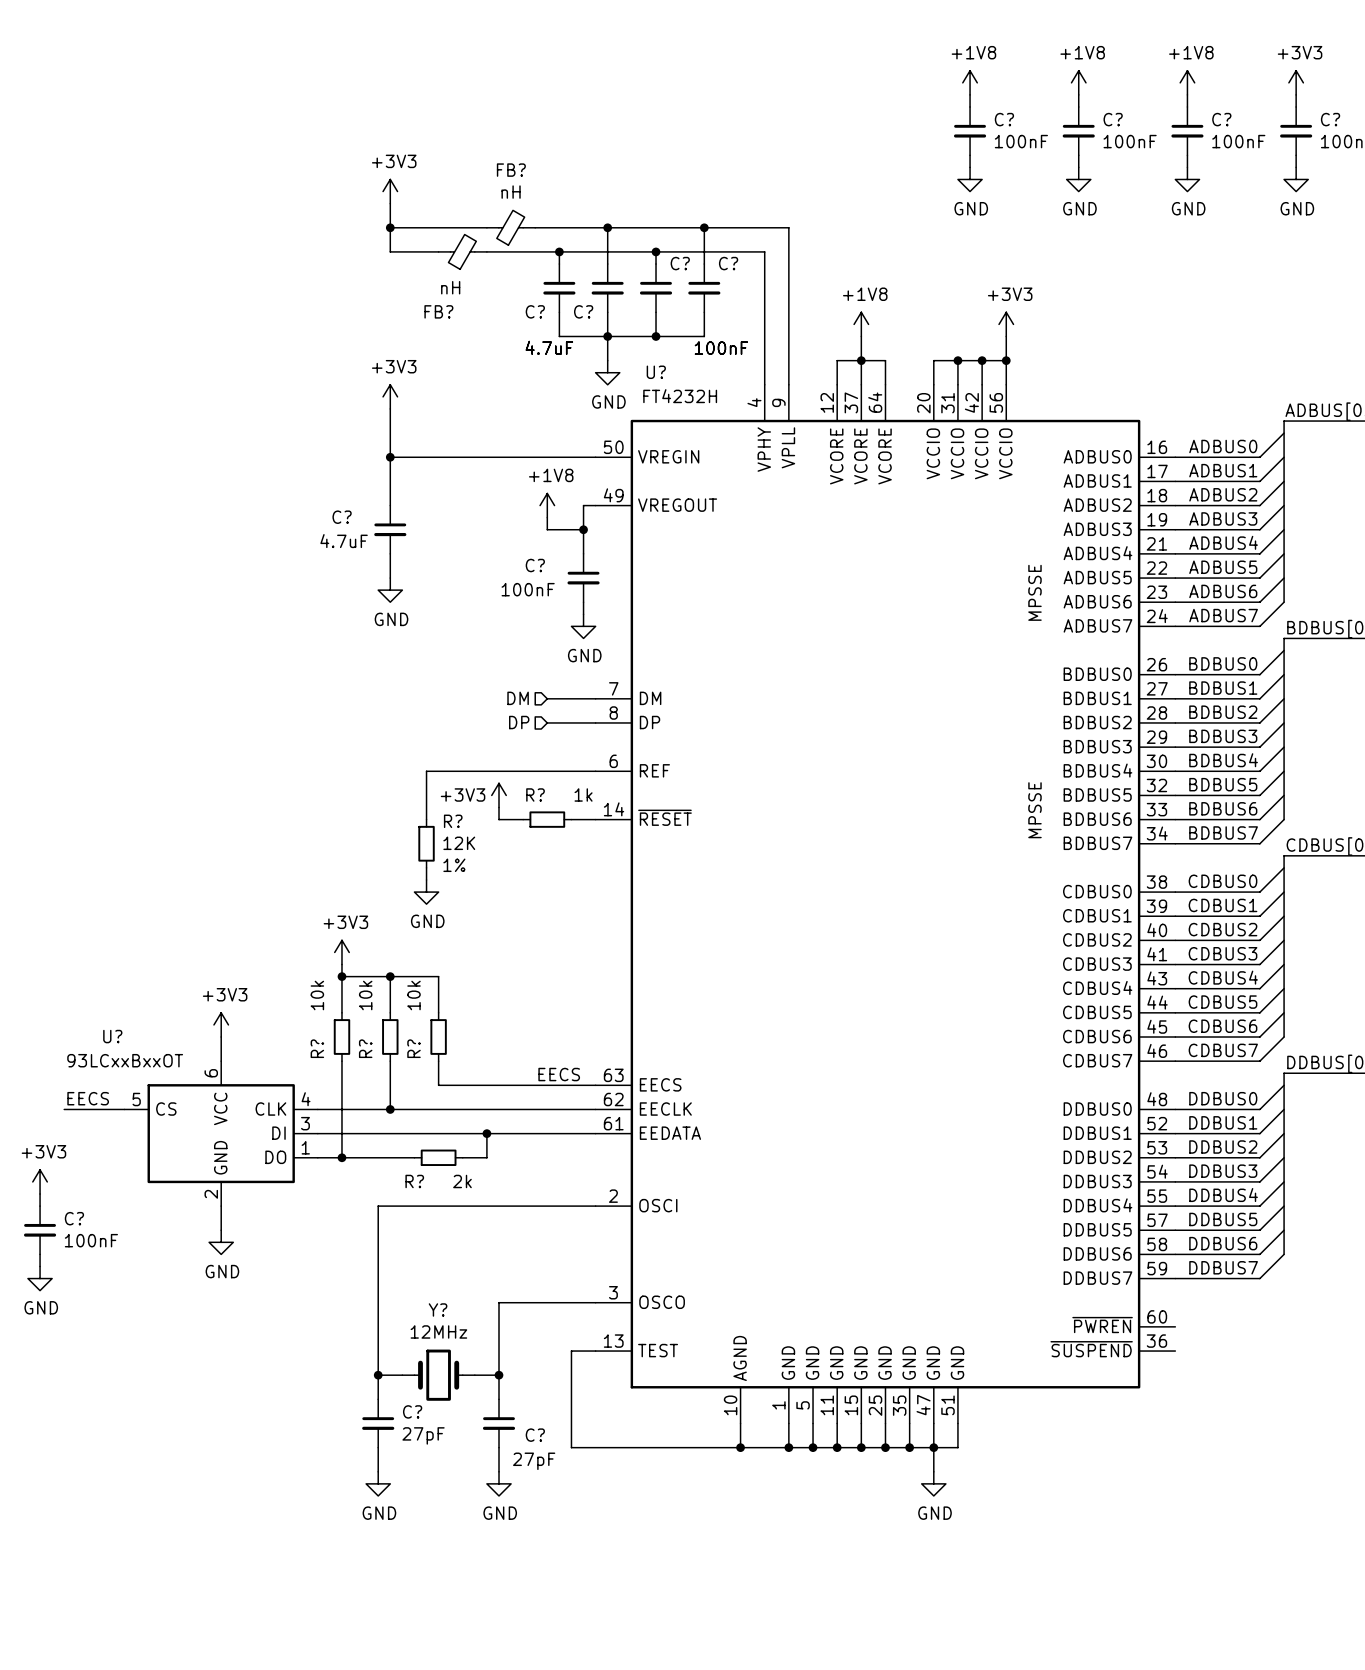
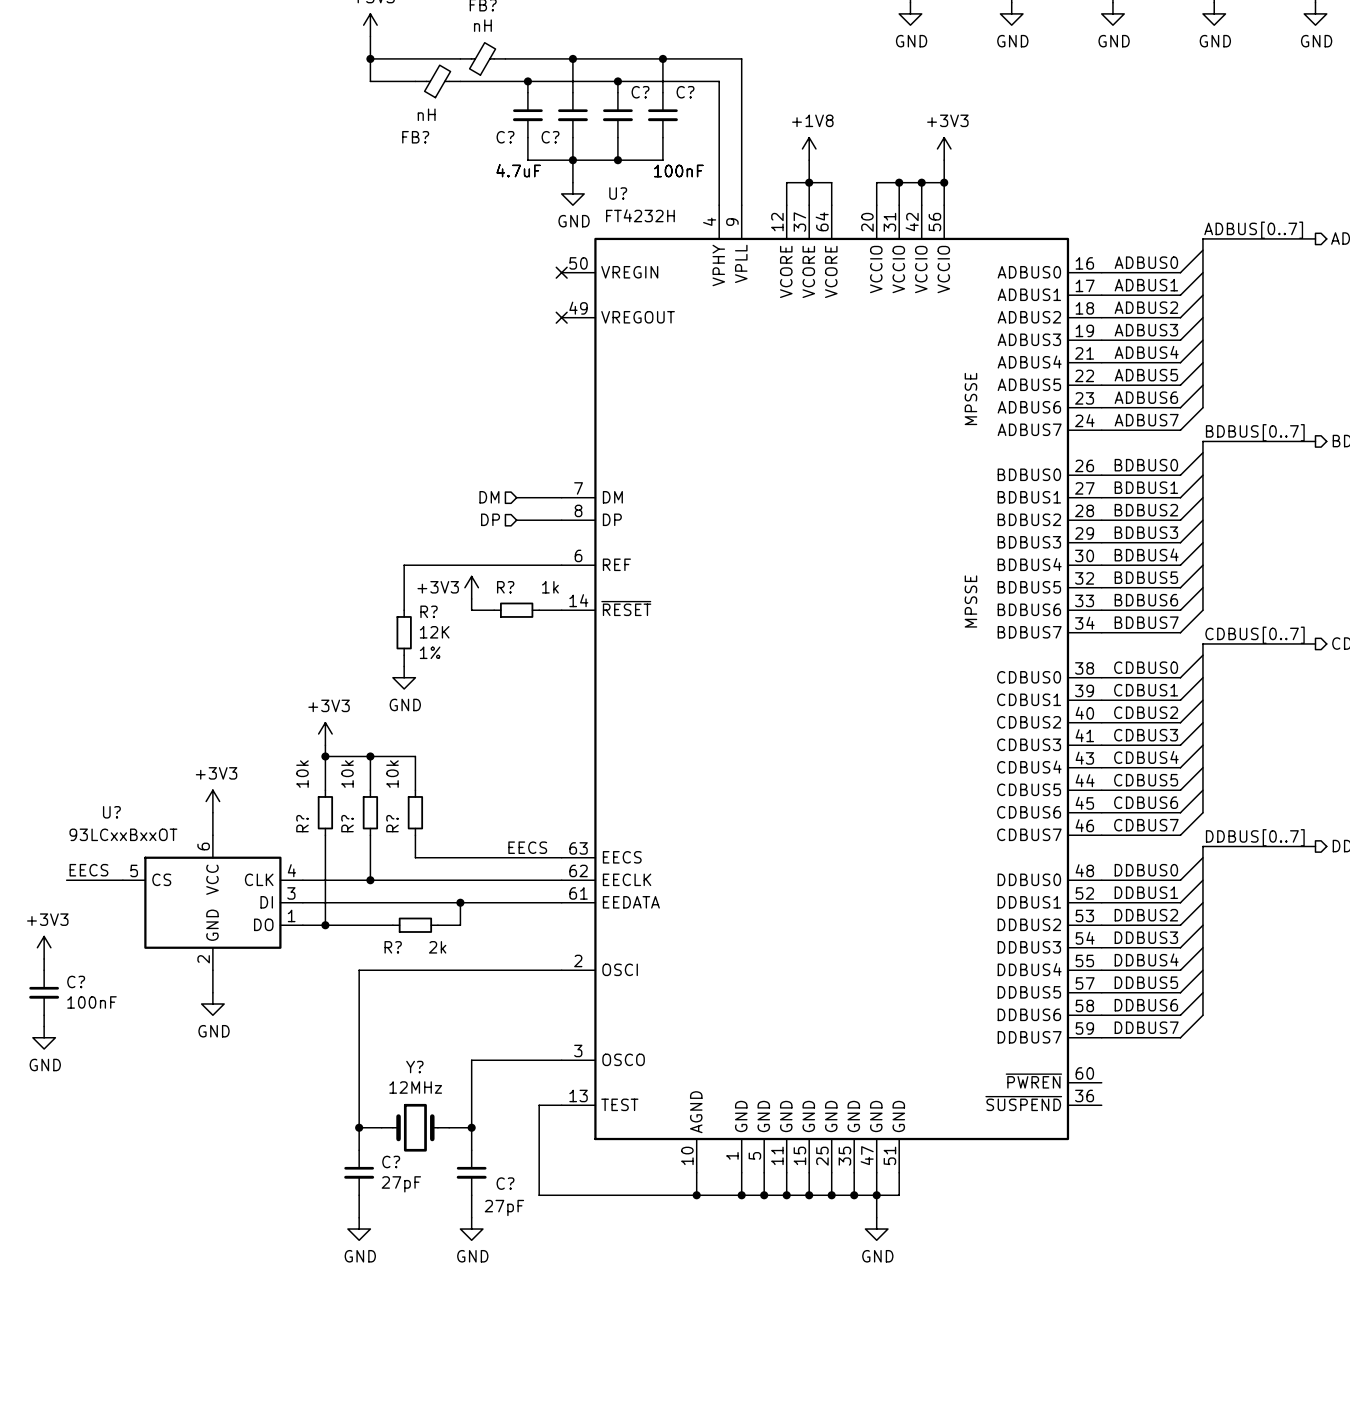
power symbol: +3V3 (390, 396) -> none
wire: (390, 408) (390, 505) -> none
wire: (390, 457) (595, 457) -> none
junction: (390, 457) -> none
no-connect mark: none -> (561, 272)
power symbol: +1V8 (547, 505) -> none
wire: (595, 505) (583, 505) (583, 553) -> none
no-connect mark: none -> (561, 317)
wire: (547, 517) (547, 529) (583, 529) -> none
C?: 4.7uF (390, 529) -> none
junction: (583, 529) -> none
wire: (390, 553) (390, 578) -> none
C?: 100nF (583, 578) -> none
power symbol: GND (390, 590) -> none
wire: (583, 602) (583, 614) -> none
power symbol: GND (583, 626) -> none

